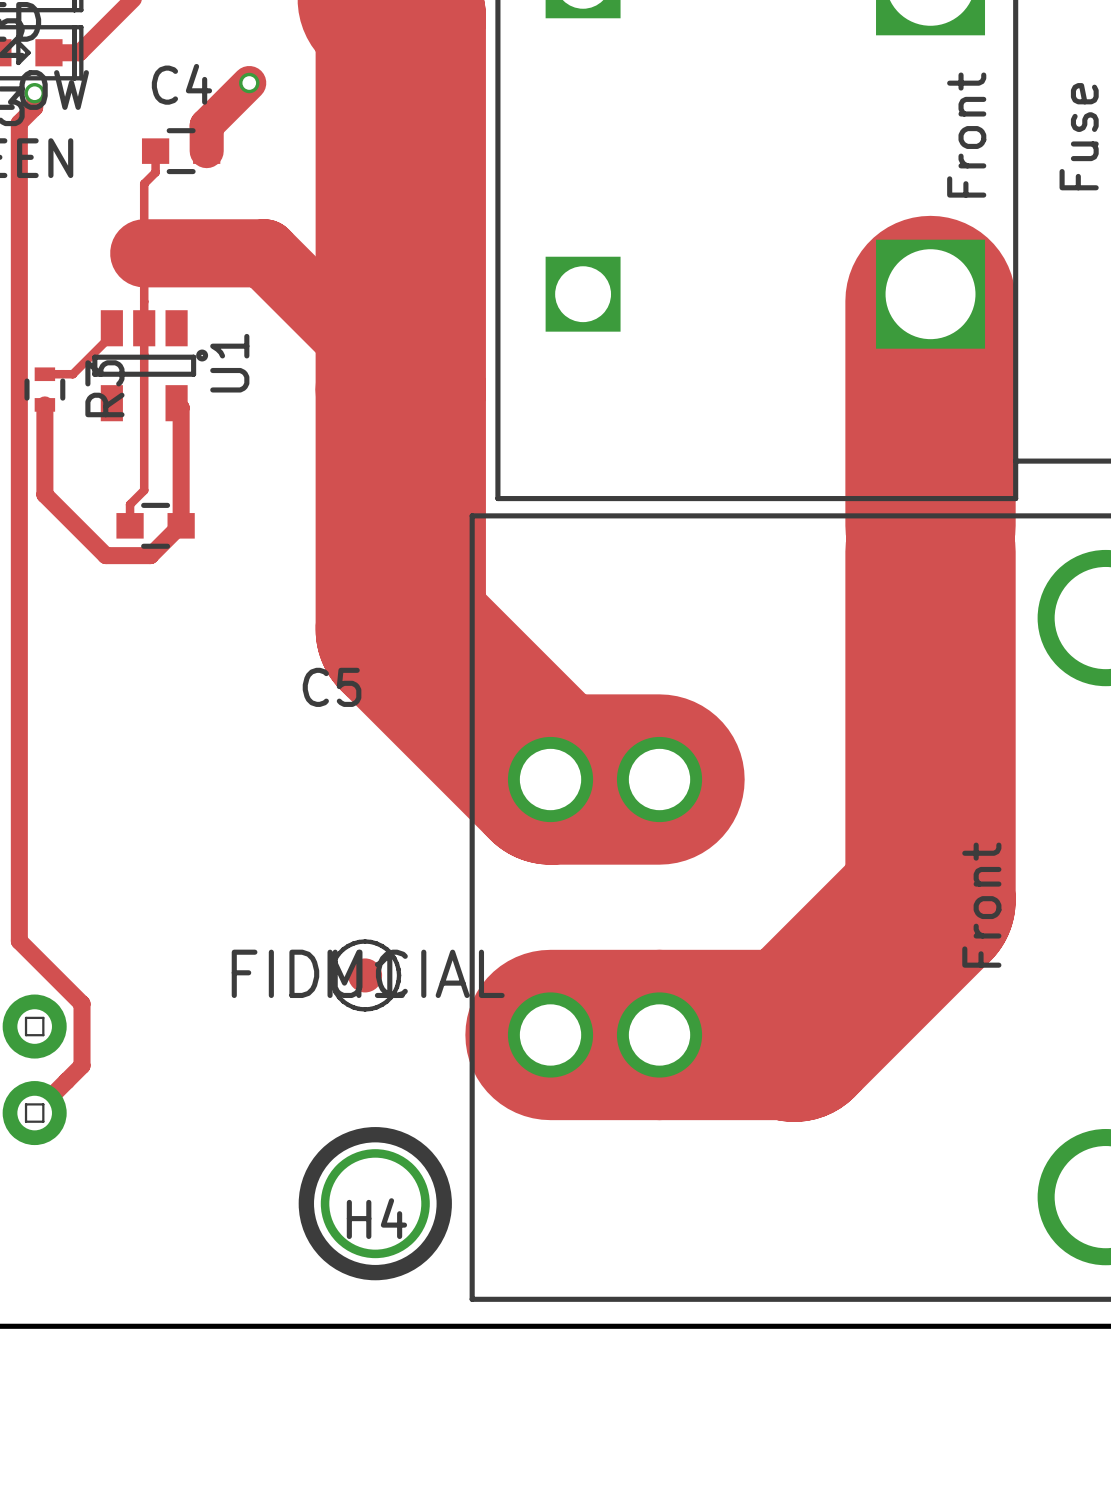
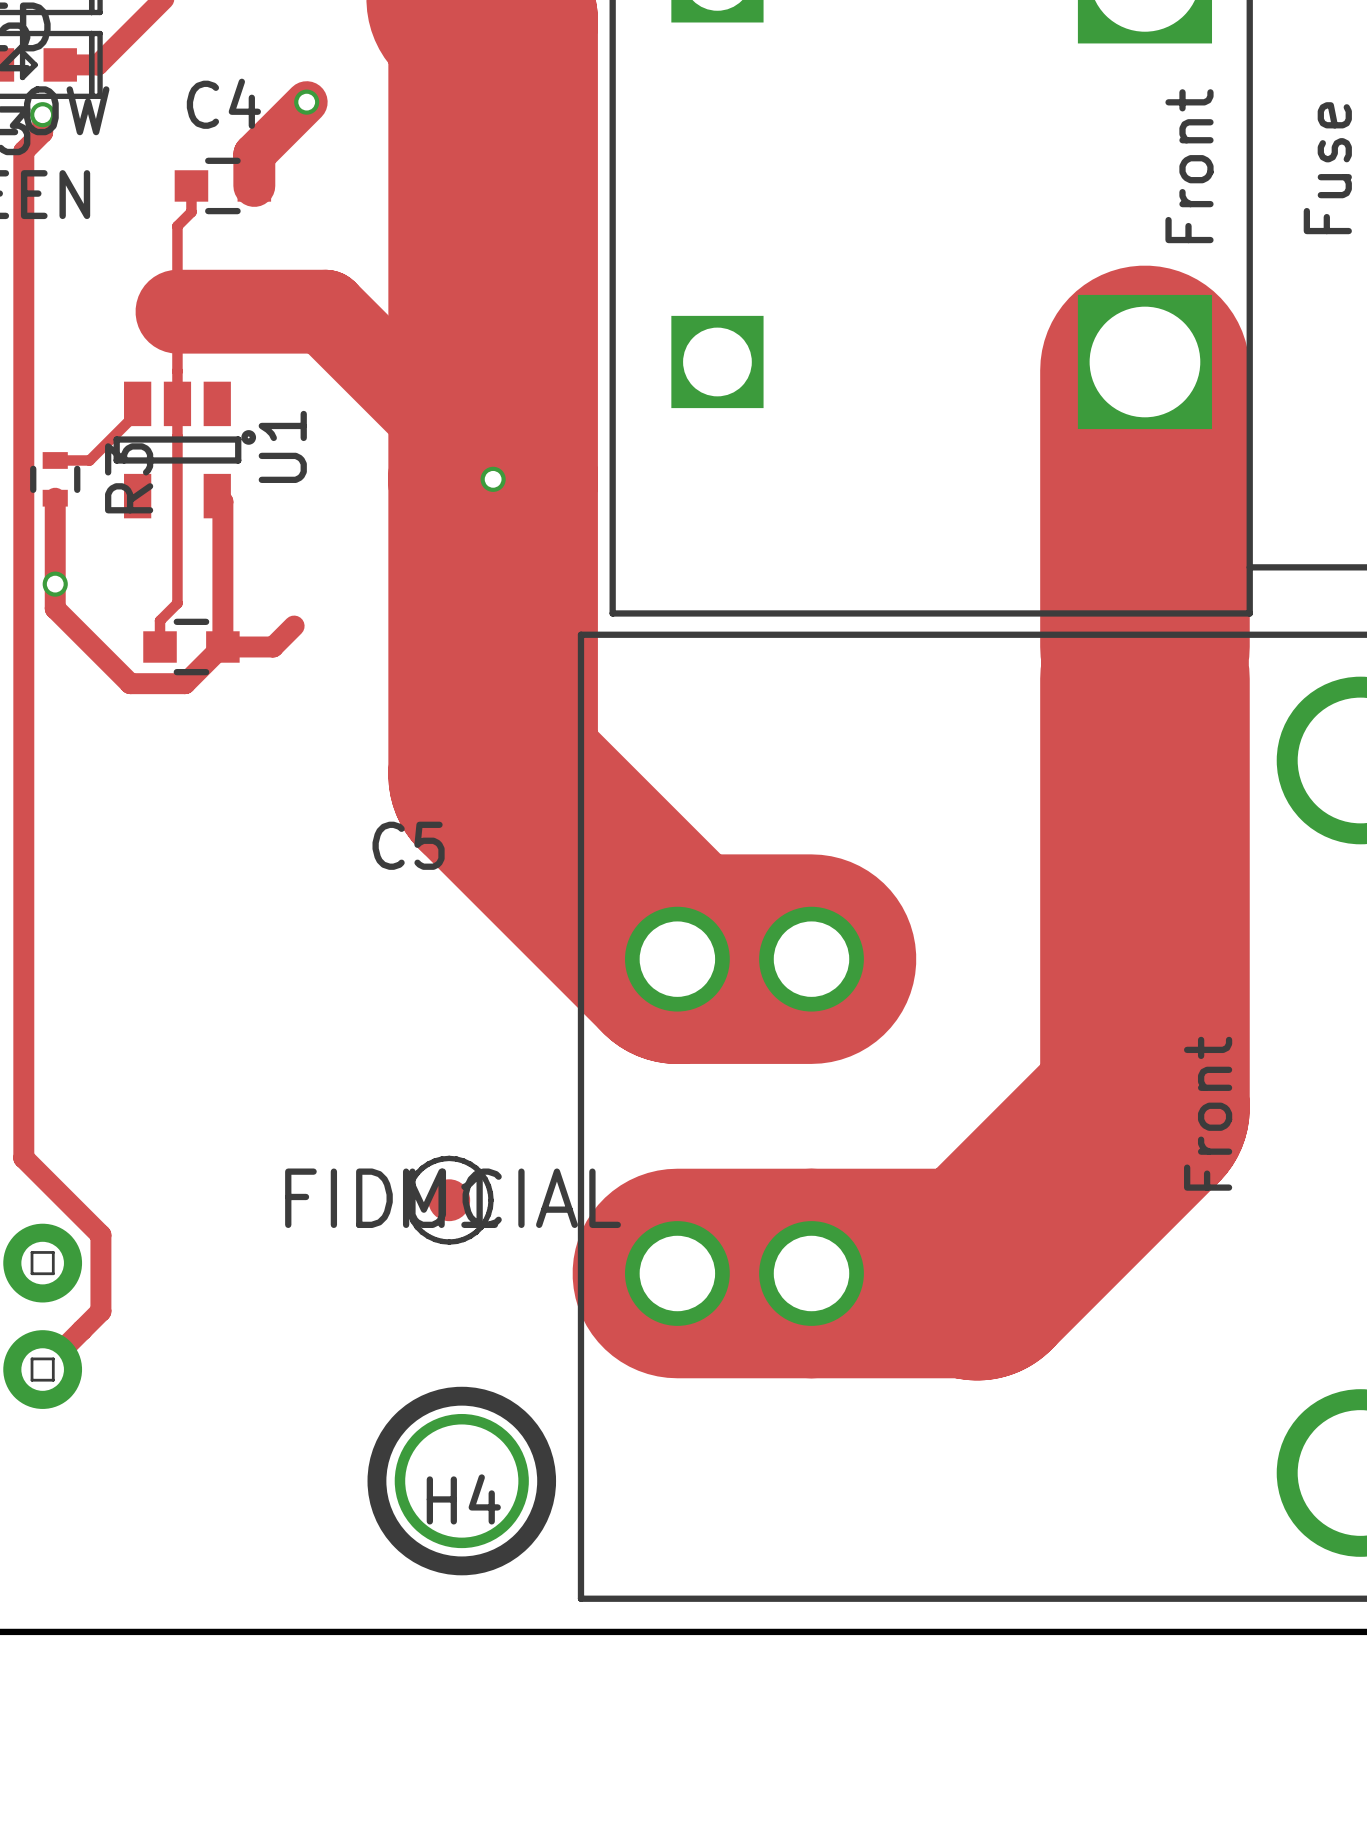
via: none -> (493, 479)
via: none -> (55, 584)
track: none -> (294, 626) (273, 646) (222, 646)

